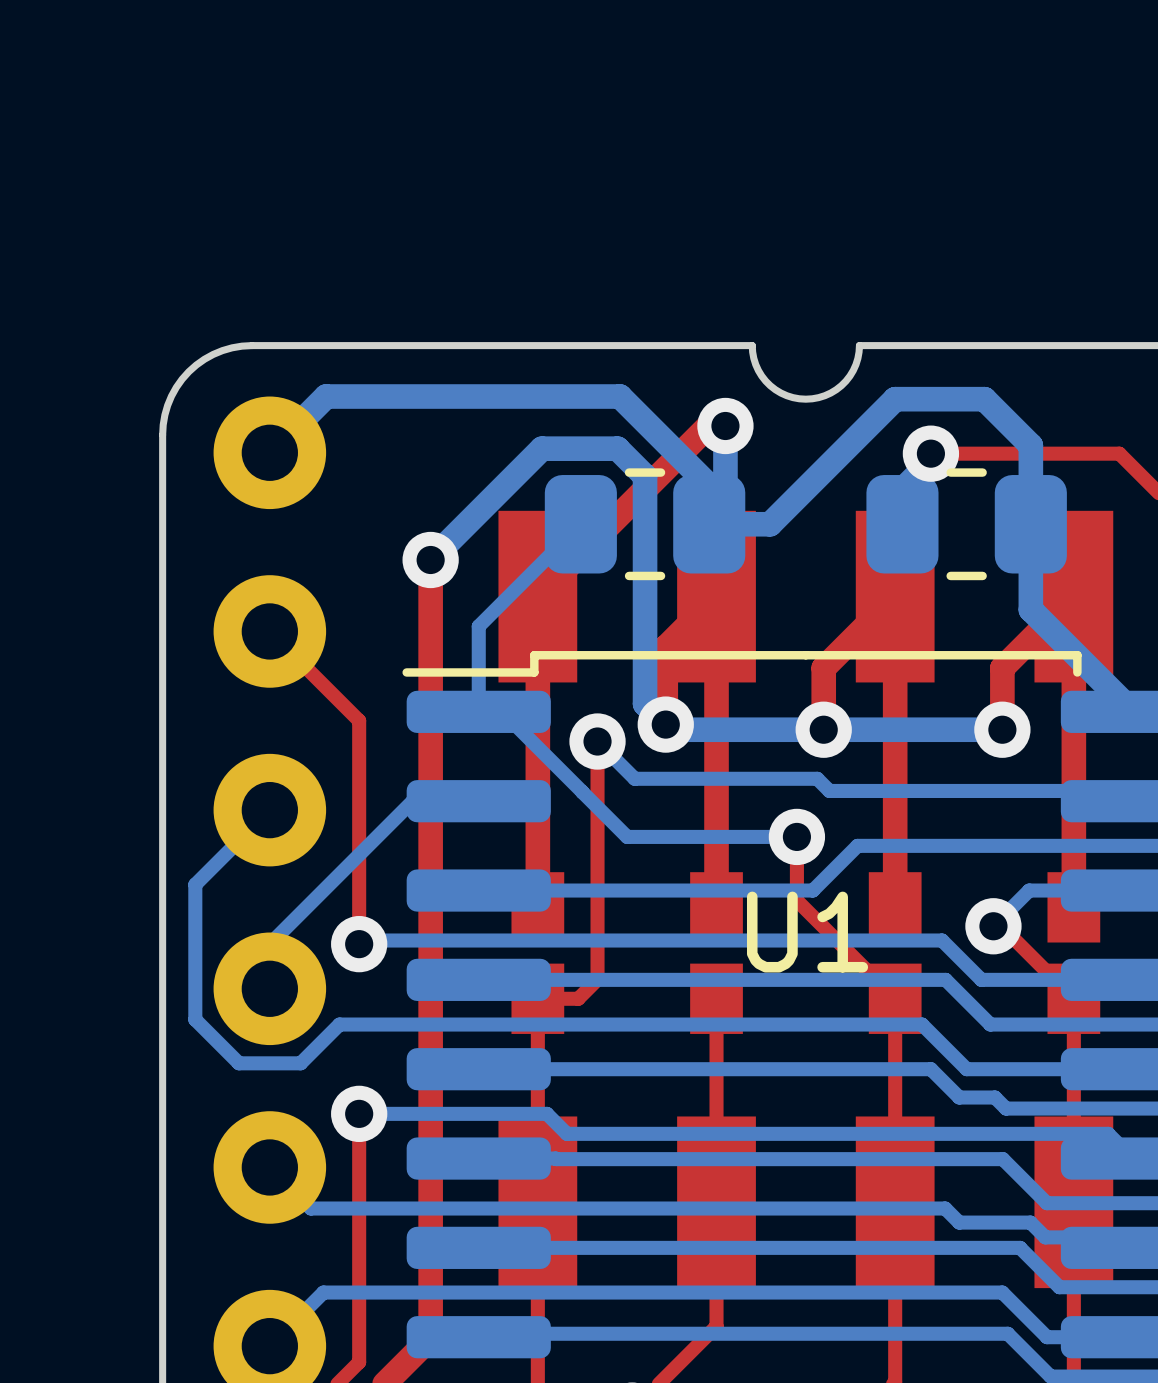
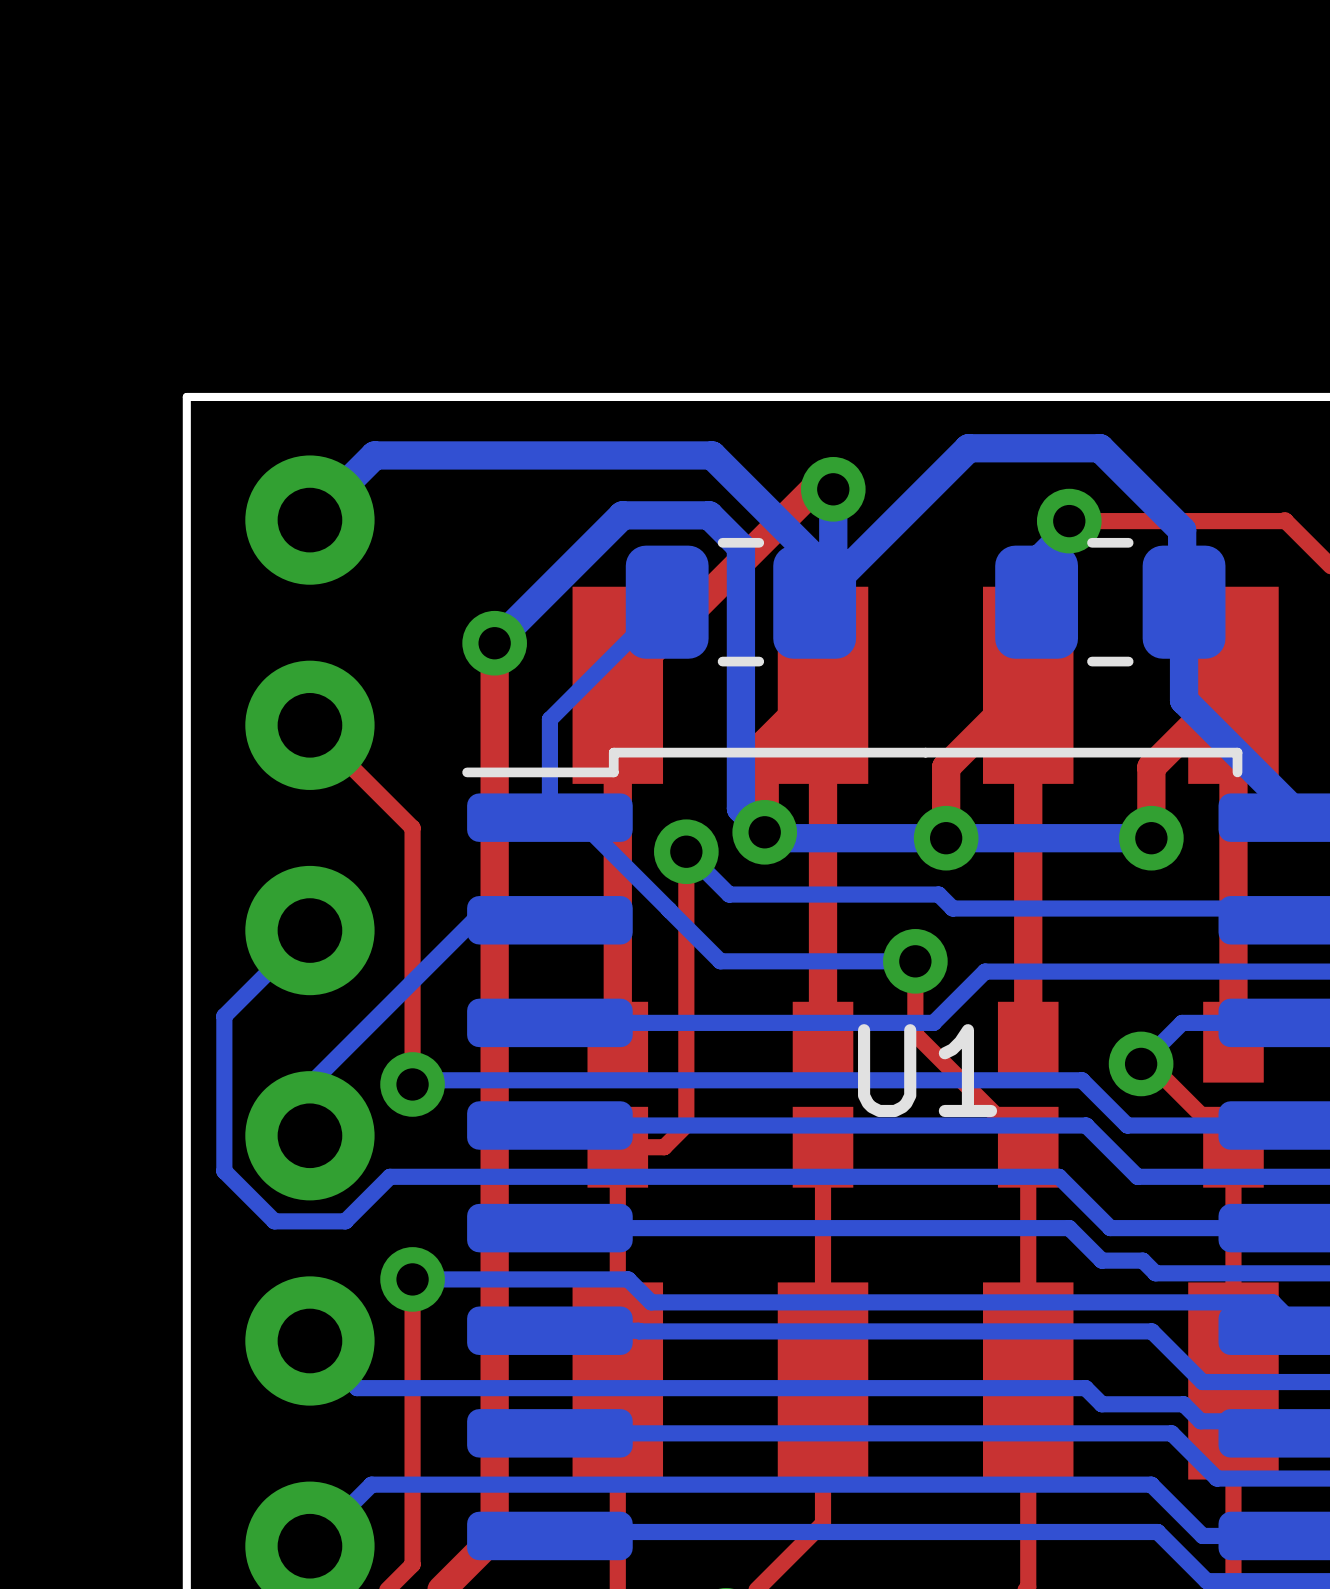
board edge: (251, 345) (222, 350) (204, 359) (188, 371) (176, 387) (167, 405) (162, 434) -> (289, 396) (186, 396) (186, 499)
board edge: (859, 345) (857, 358) (853, 370) (841, 385) (824, 395) (805, 399) (786, 395) (770, 385) (761, 376) (755, 364) (752, 345) -> (987, 396) (864, 396)
bottom track: (1030, 524) (1030, 445) (984, 399) (895, 399) (770, 524) (709, 524) -> (1184, 602) (1182, 600) (1182, 530) (1100, 448) (968, 448) (833, 583)

